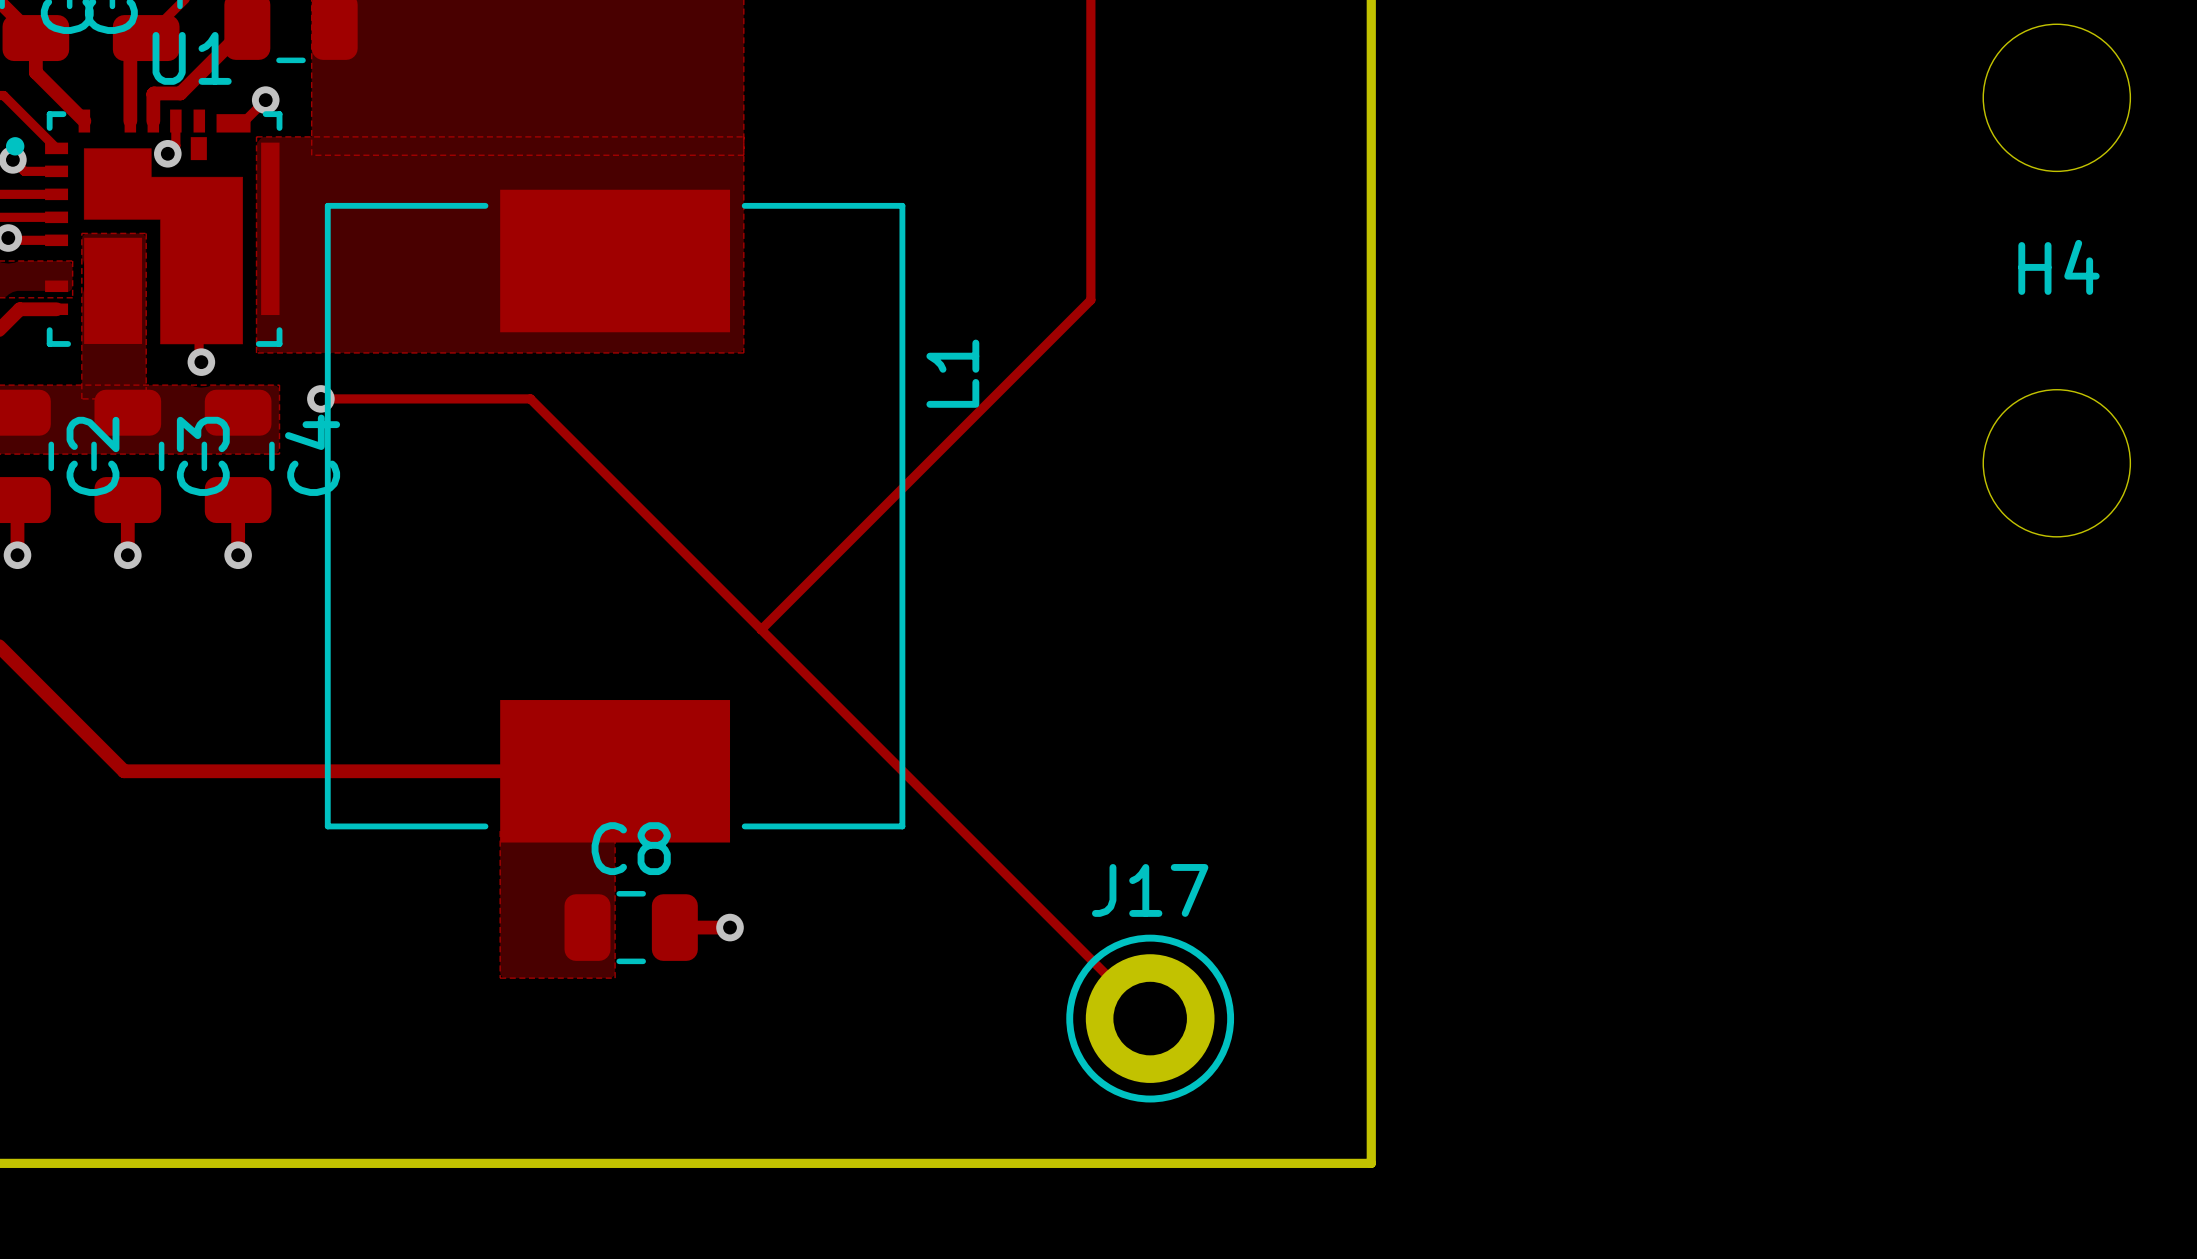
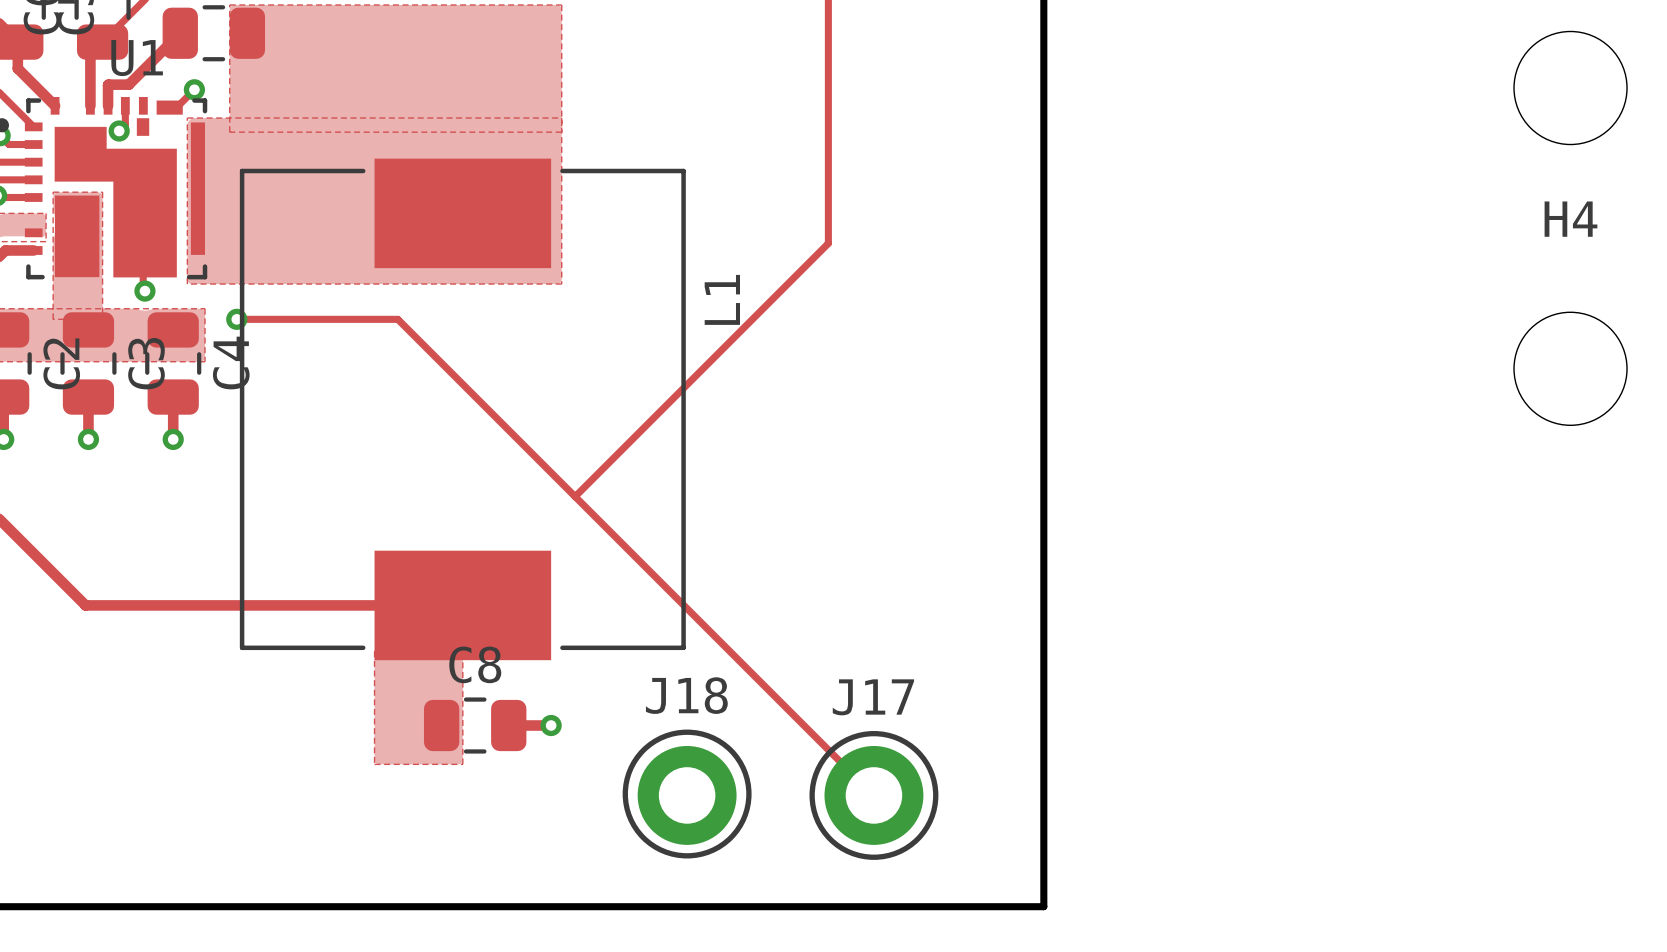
J18: none -> (687, 794)

